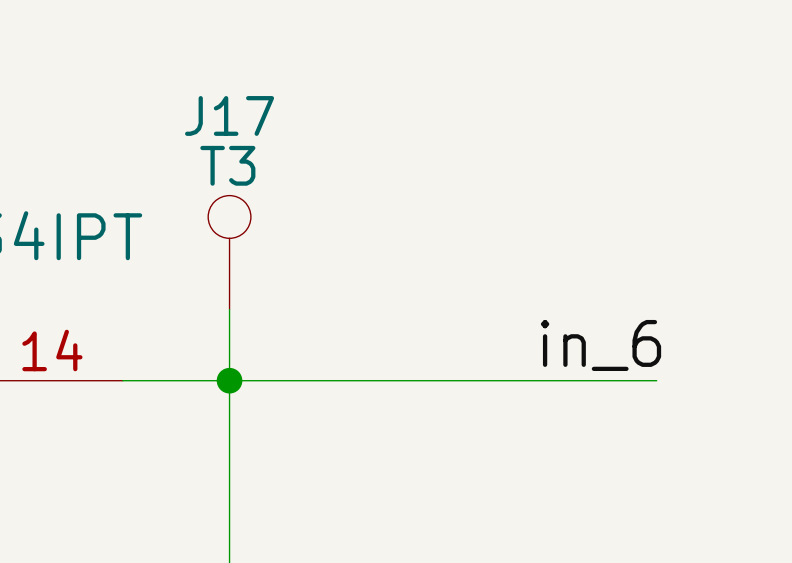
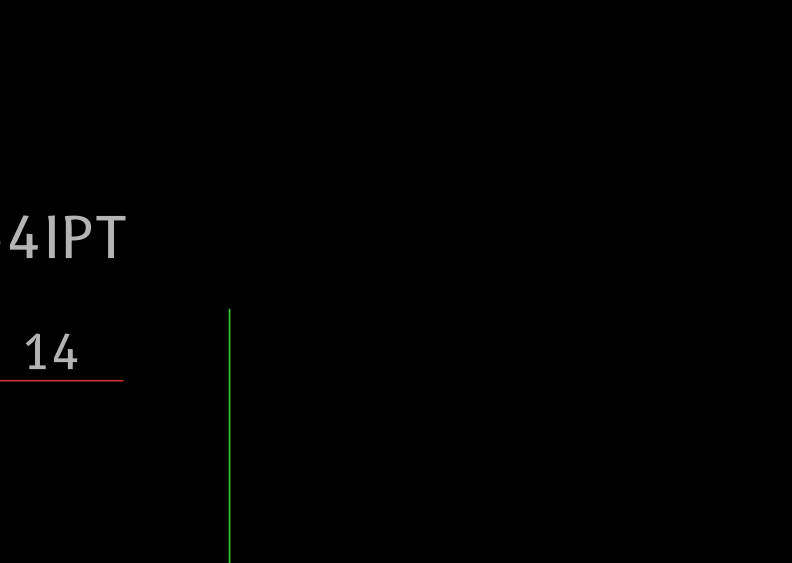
J17: T3 (229, 252) -> none
label: in_6 (601, 345) -> none
wire: (122, 380) (656, 380) -> none
junction: (229, 380) -> none

